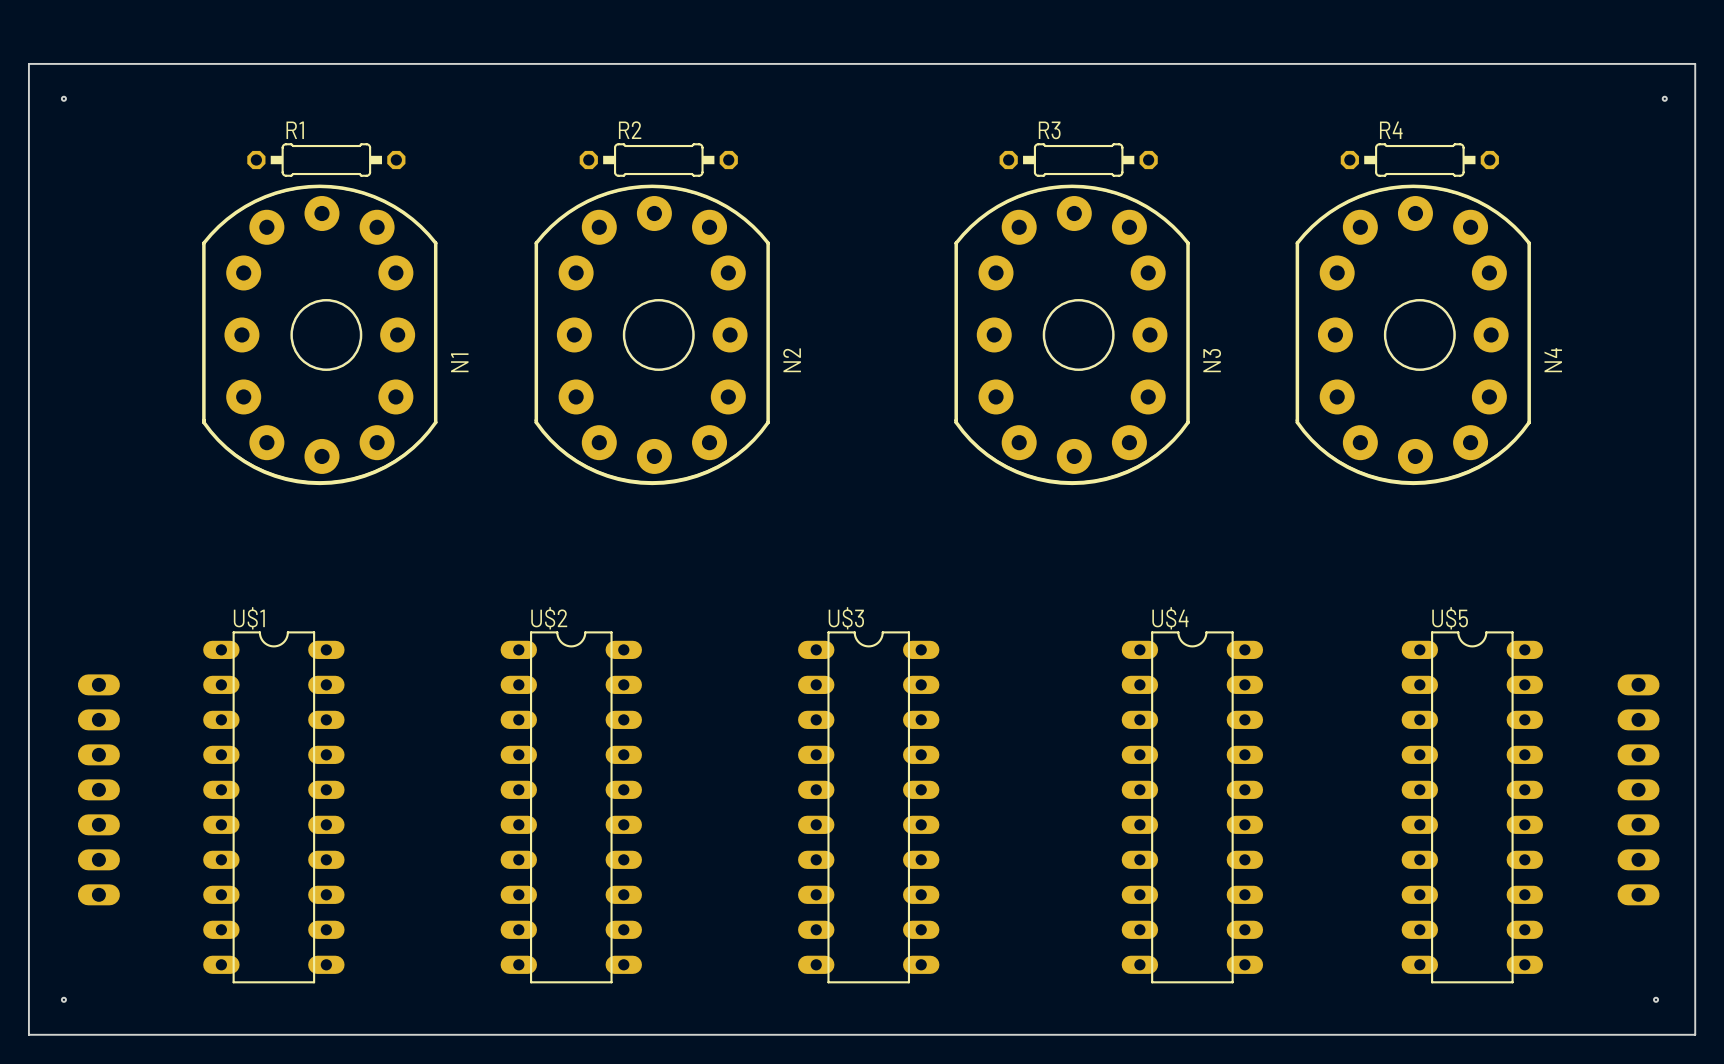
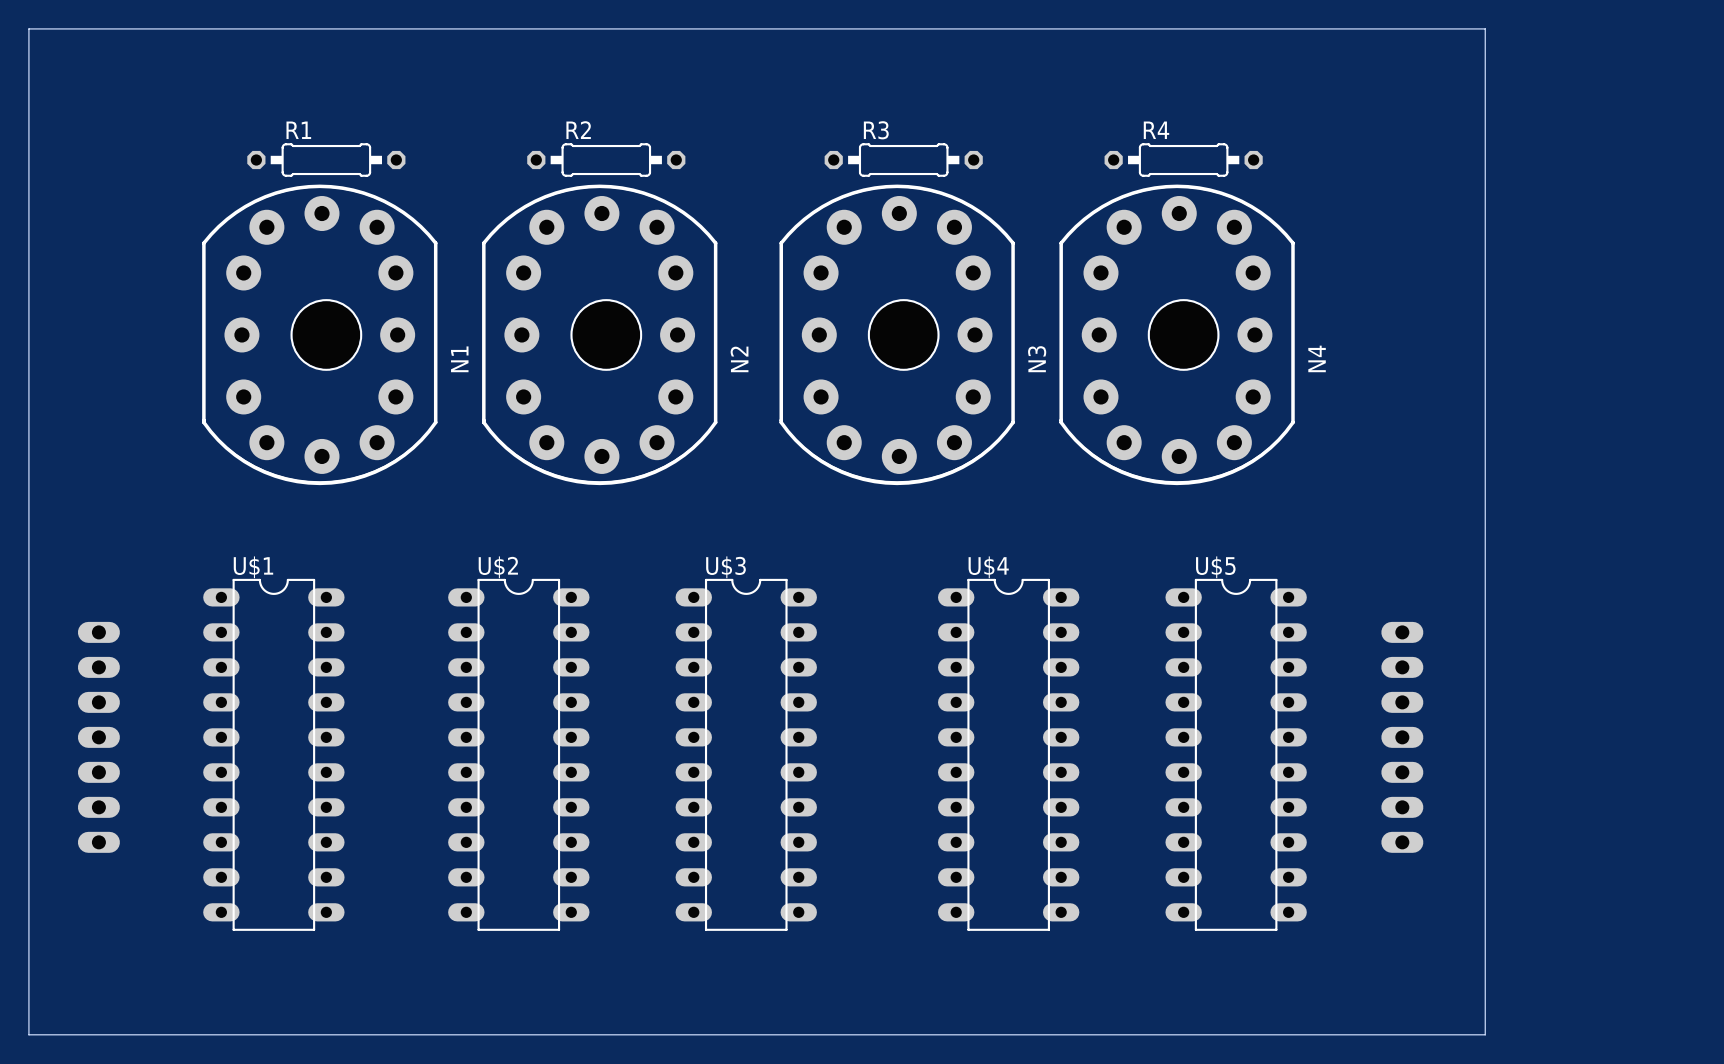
board edge: (28, 63) (1695, 63) (1695, 1034) (1485, 1034) -> (28, 63) (28, 28) (1485, 28) (1485, 1034)
hole: (63, 98) -> none
hole: (1664, 98) -> none
R2 position: (658, 160) -> (606, 160)
R3 position: (1078, 160) -> (903, 160)
R4 position: (1419, 160) -> (1183, 160)
N2 position: (652, 334) -> (599, 334)
N3 position: (1072, 334) -> (897, 334)
N4 position: (1413, 334) -> (1177, 334)
part position: (98, 789) -> (98, 737)
part position: (1638, 789) -> (1402, 737)
U$1 position: (273, 807) -> (273, 754)
U$2 position: (571, 807) -> (518, 754)
U$3 position: (868, 807) -> (746, 754)
U$4 position: (1192, 807) -> (1008, 754)
U$5 position: (1472, 807) -> (1236, 754)
hole: (63, 999) -> none
hole: (1656, 999) -> none

